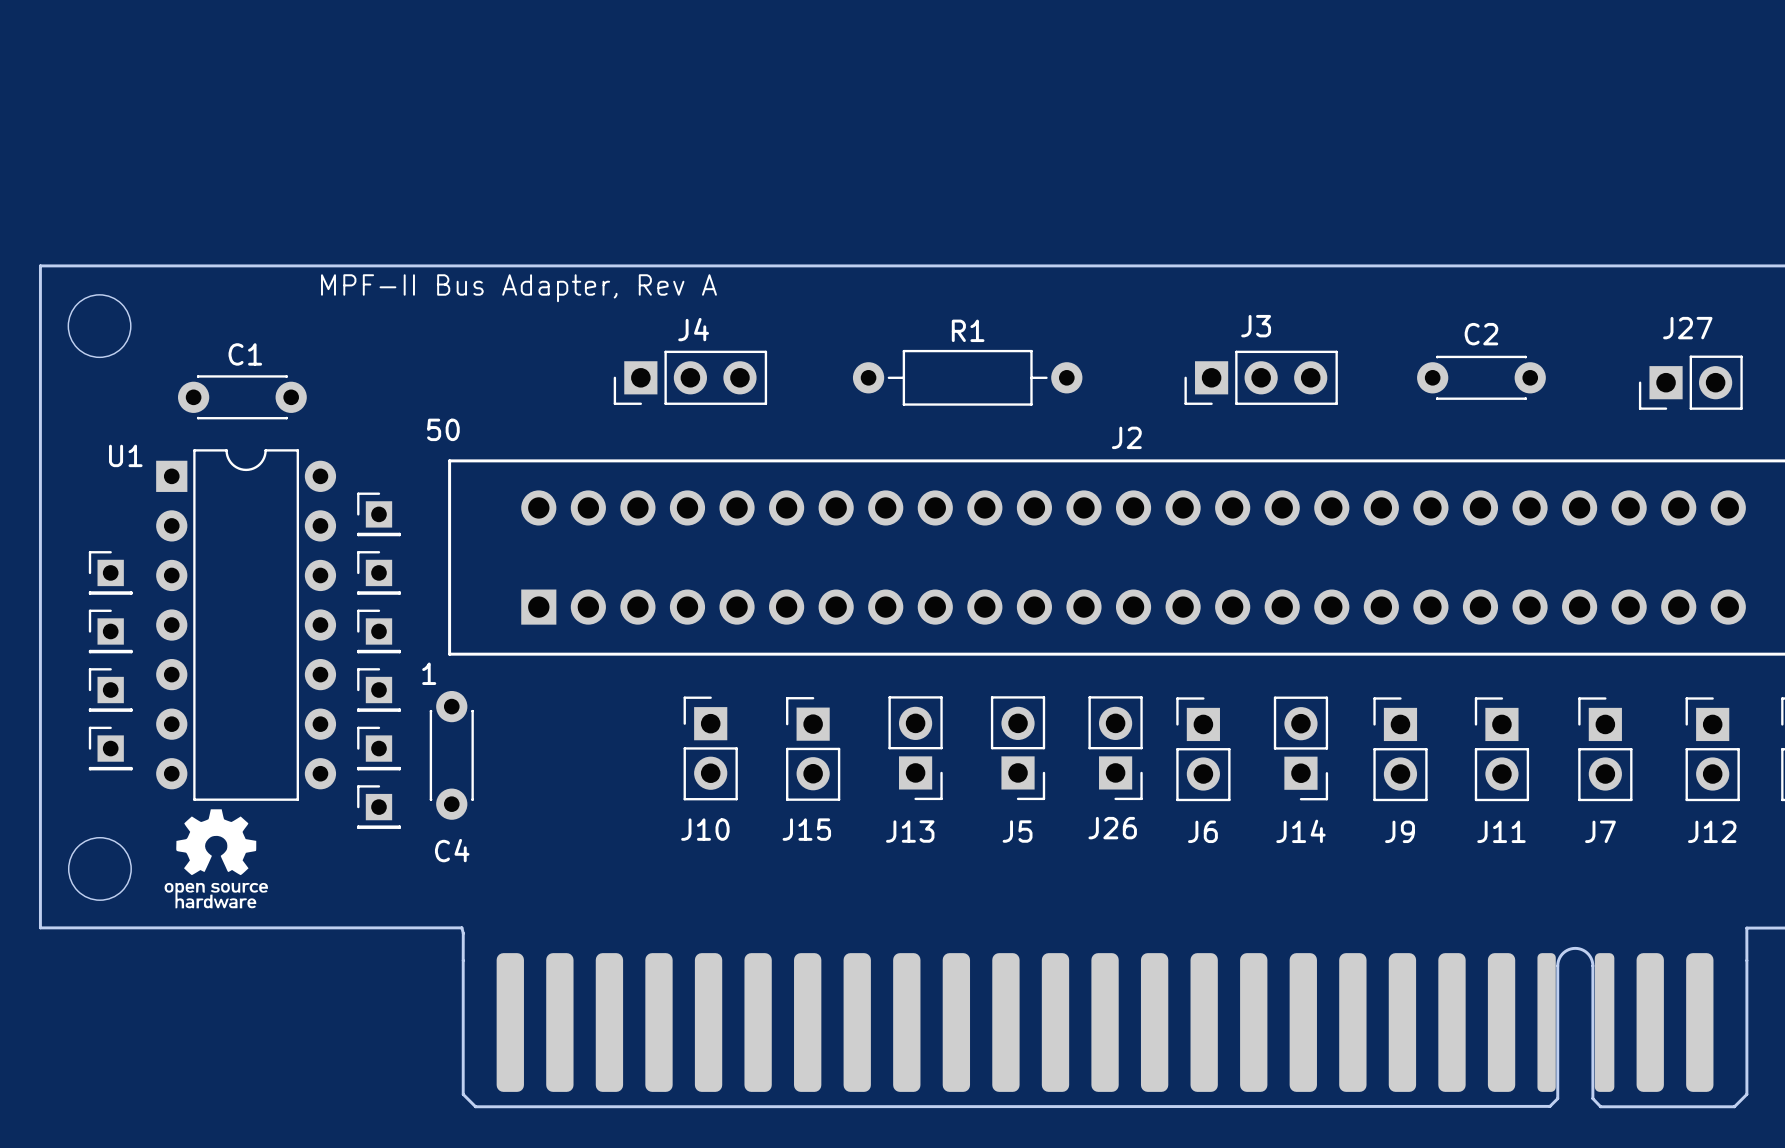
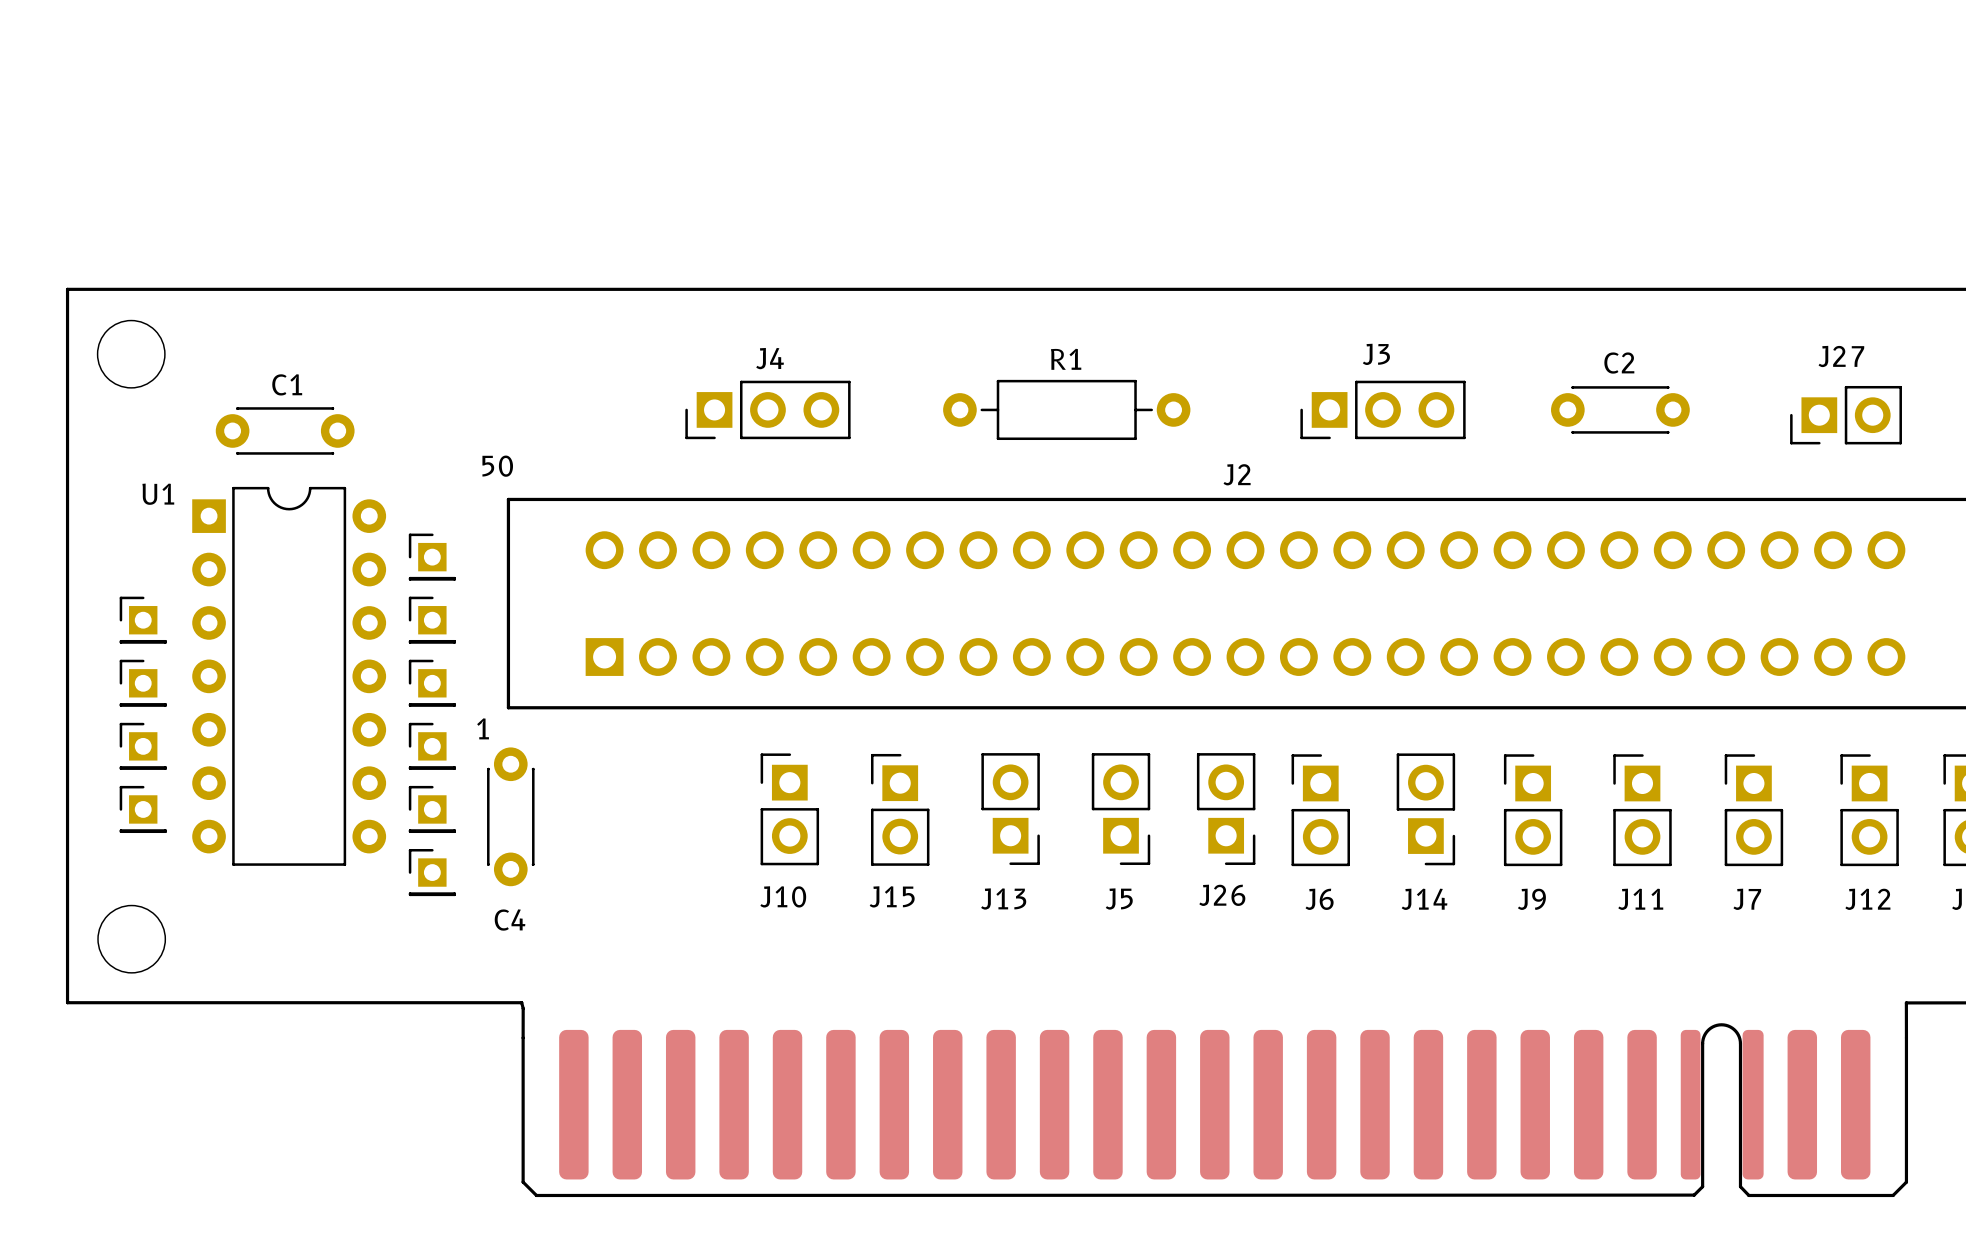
text: MPF-II Bus Adapter, Rev A (518, 288) -> none
drawing: [164, 809, 268, 909] -> none

